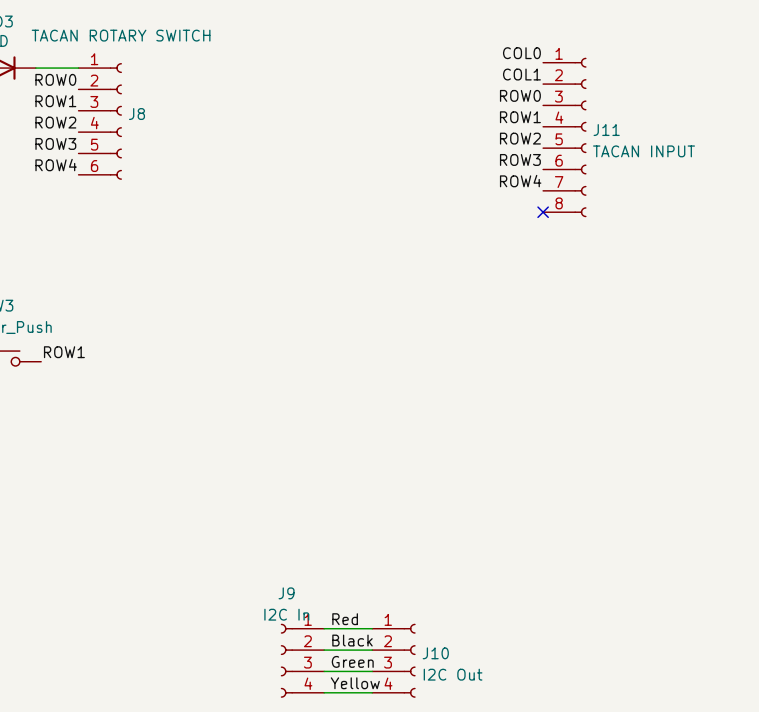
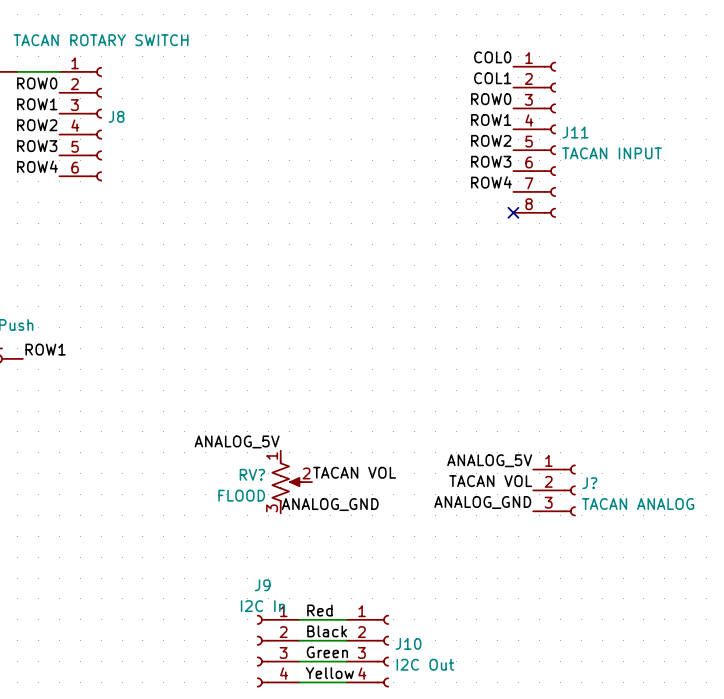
label: none -> ANALOG_5V (237, 441)
label: none -> ANALOG_5V (489, 460)
label: none -> TACAN VOL (354, 472)
label: none -> TACAN VOL (490, 481)
RV?: none -> FLOOD (292, 482)
J?: none -> TACAN ANALOG (554, 490)
label: none -> ANALOG_GND (482, 502)
label: none -> ANALOG_GND (330, 504)

